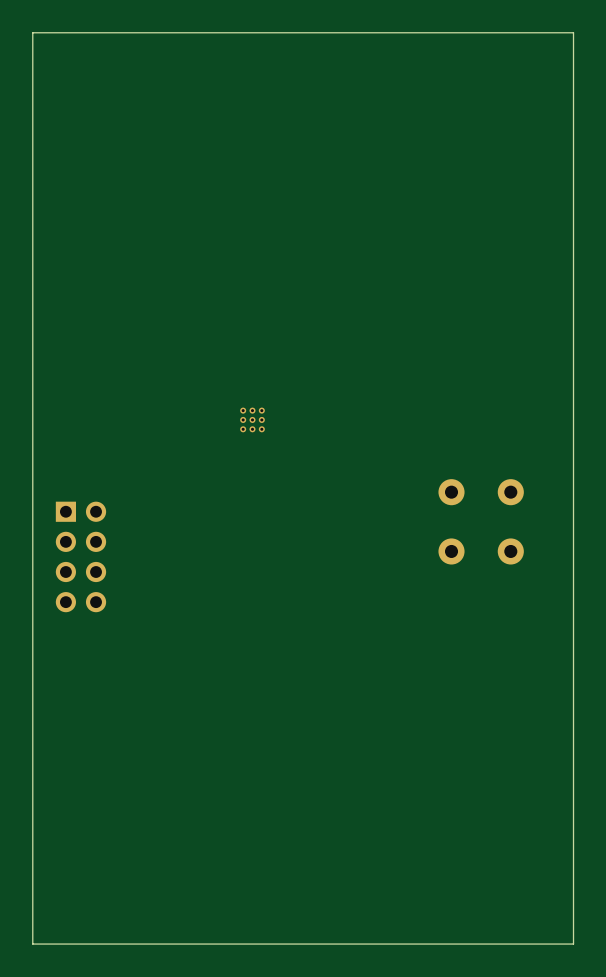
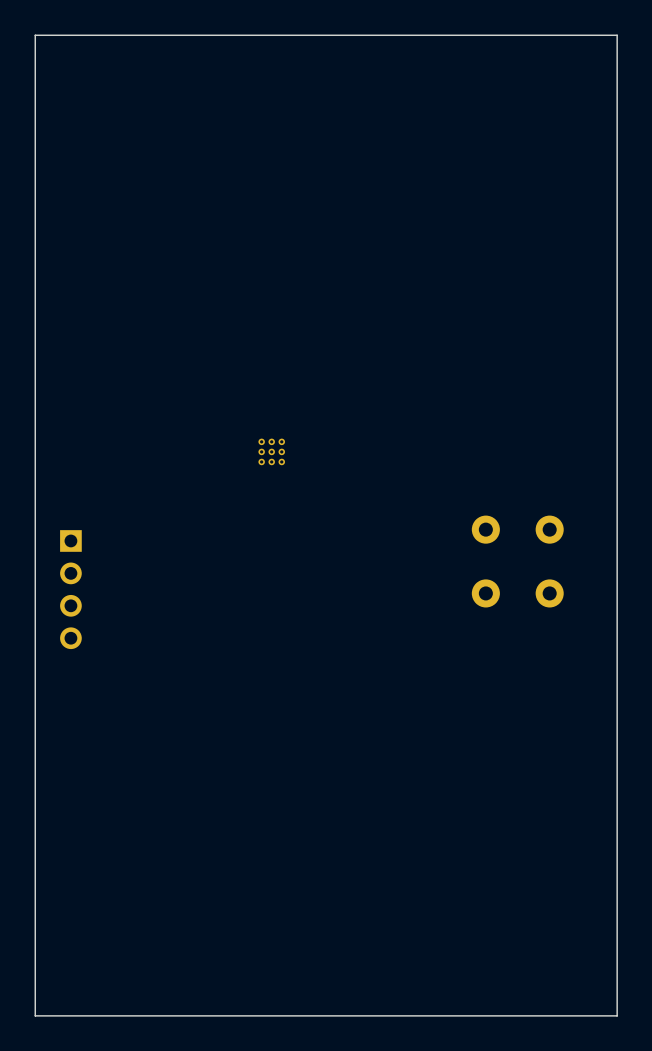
part: none -> (70, 589)
part: (80, 556) -> none

